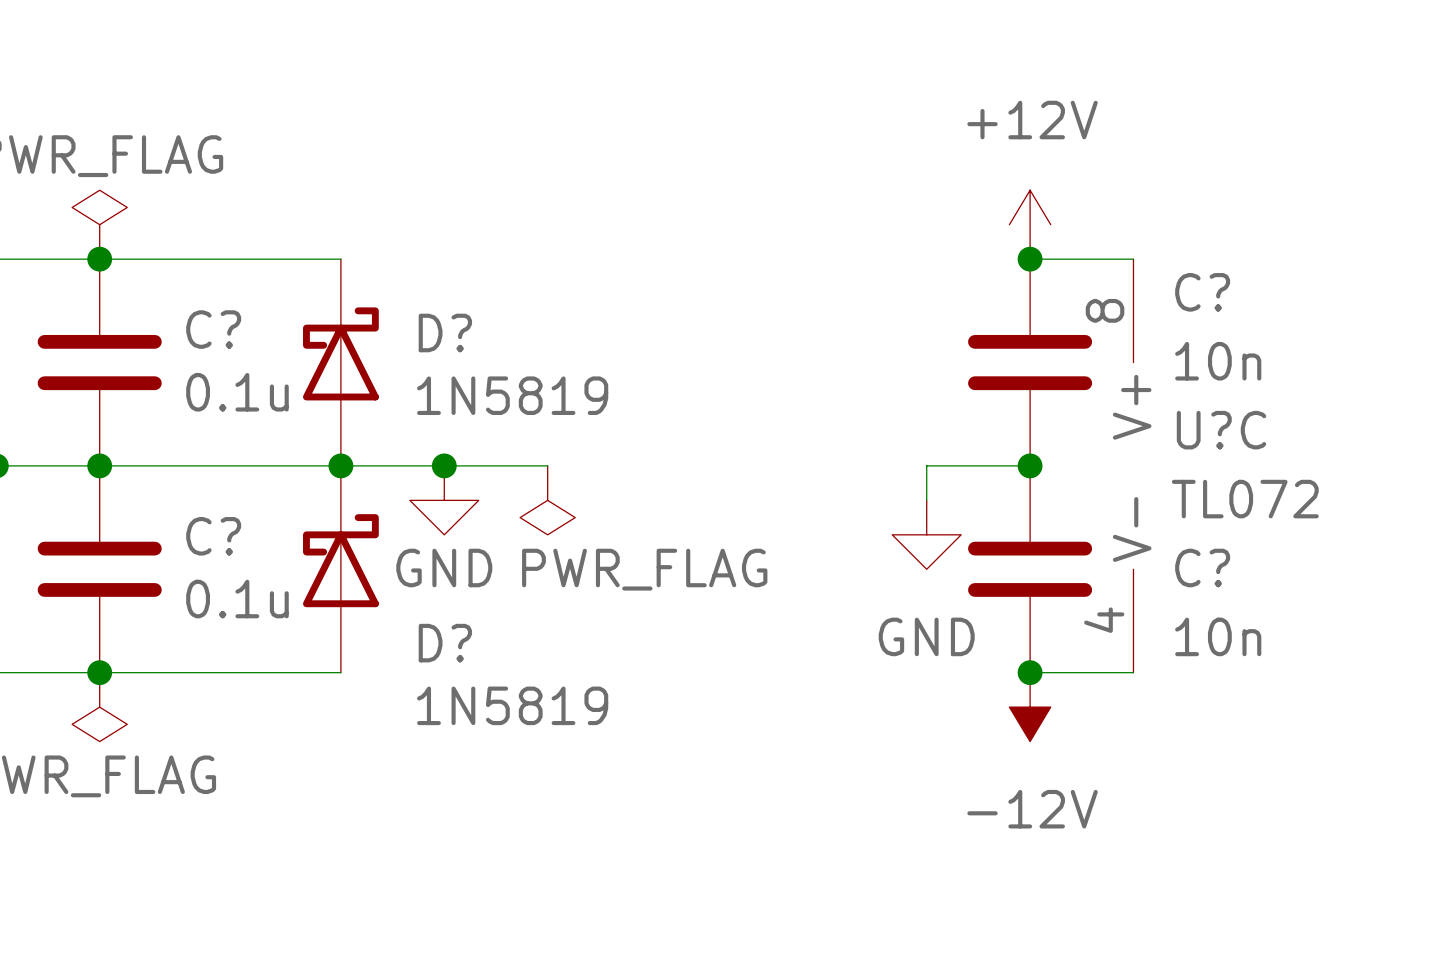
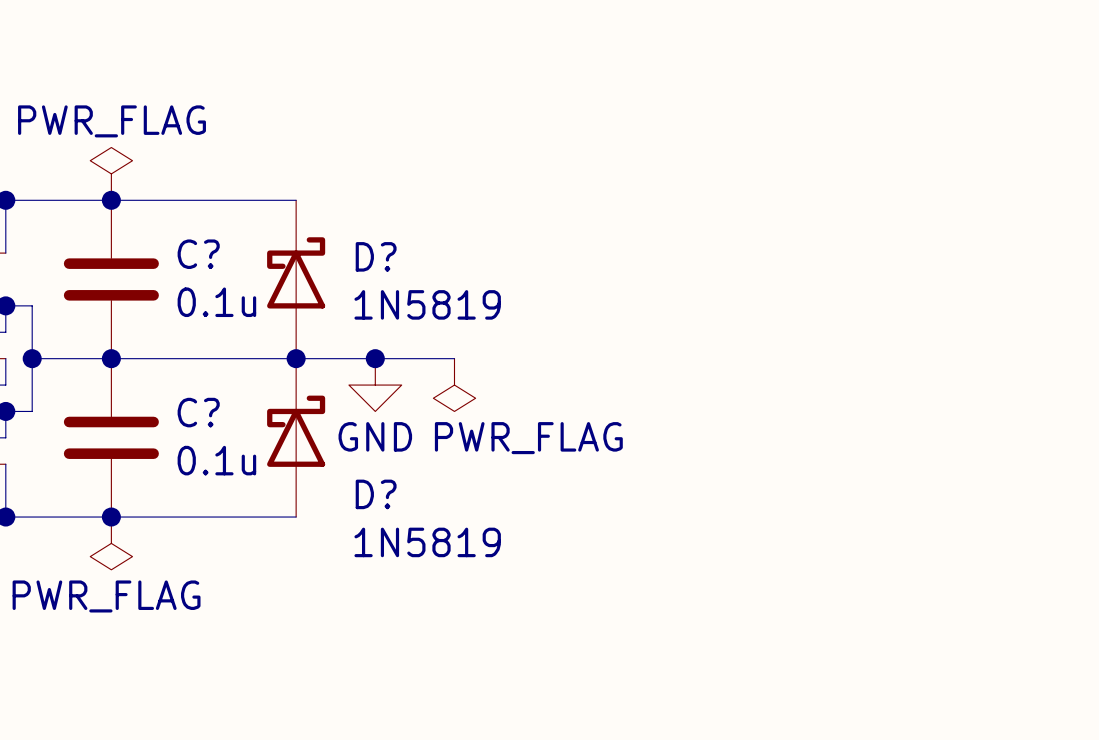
power symbol: +12V (1030, 224) -> none
wire: (1030, 259) (1133, 259) -> none
junction: (1030, 259) -> none
C?: 10n (1030, 362) -> none
wire: (1030, 465) (926, 465) (926, 500) -> none
junction: (1030, 465) -> none
U?C: TL072 (1133, 465) -> none
power symbol: GND (926, 534) -> none
C?: 10n (1030, 569) -> none
wire: (1030, 672) (1133, 672) -> none
junction: (1030, 672) -> none
power symbol: -12V (1030, 707) -> none

